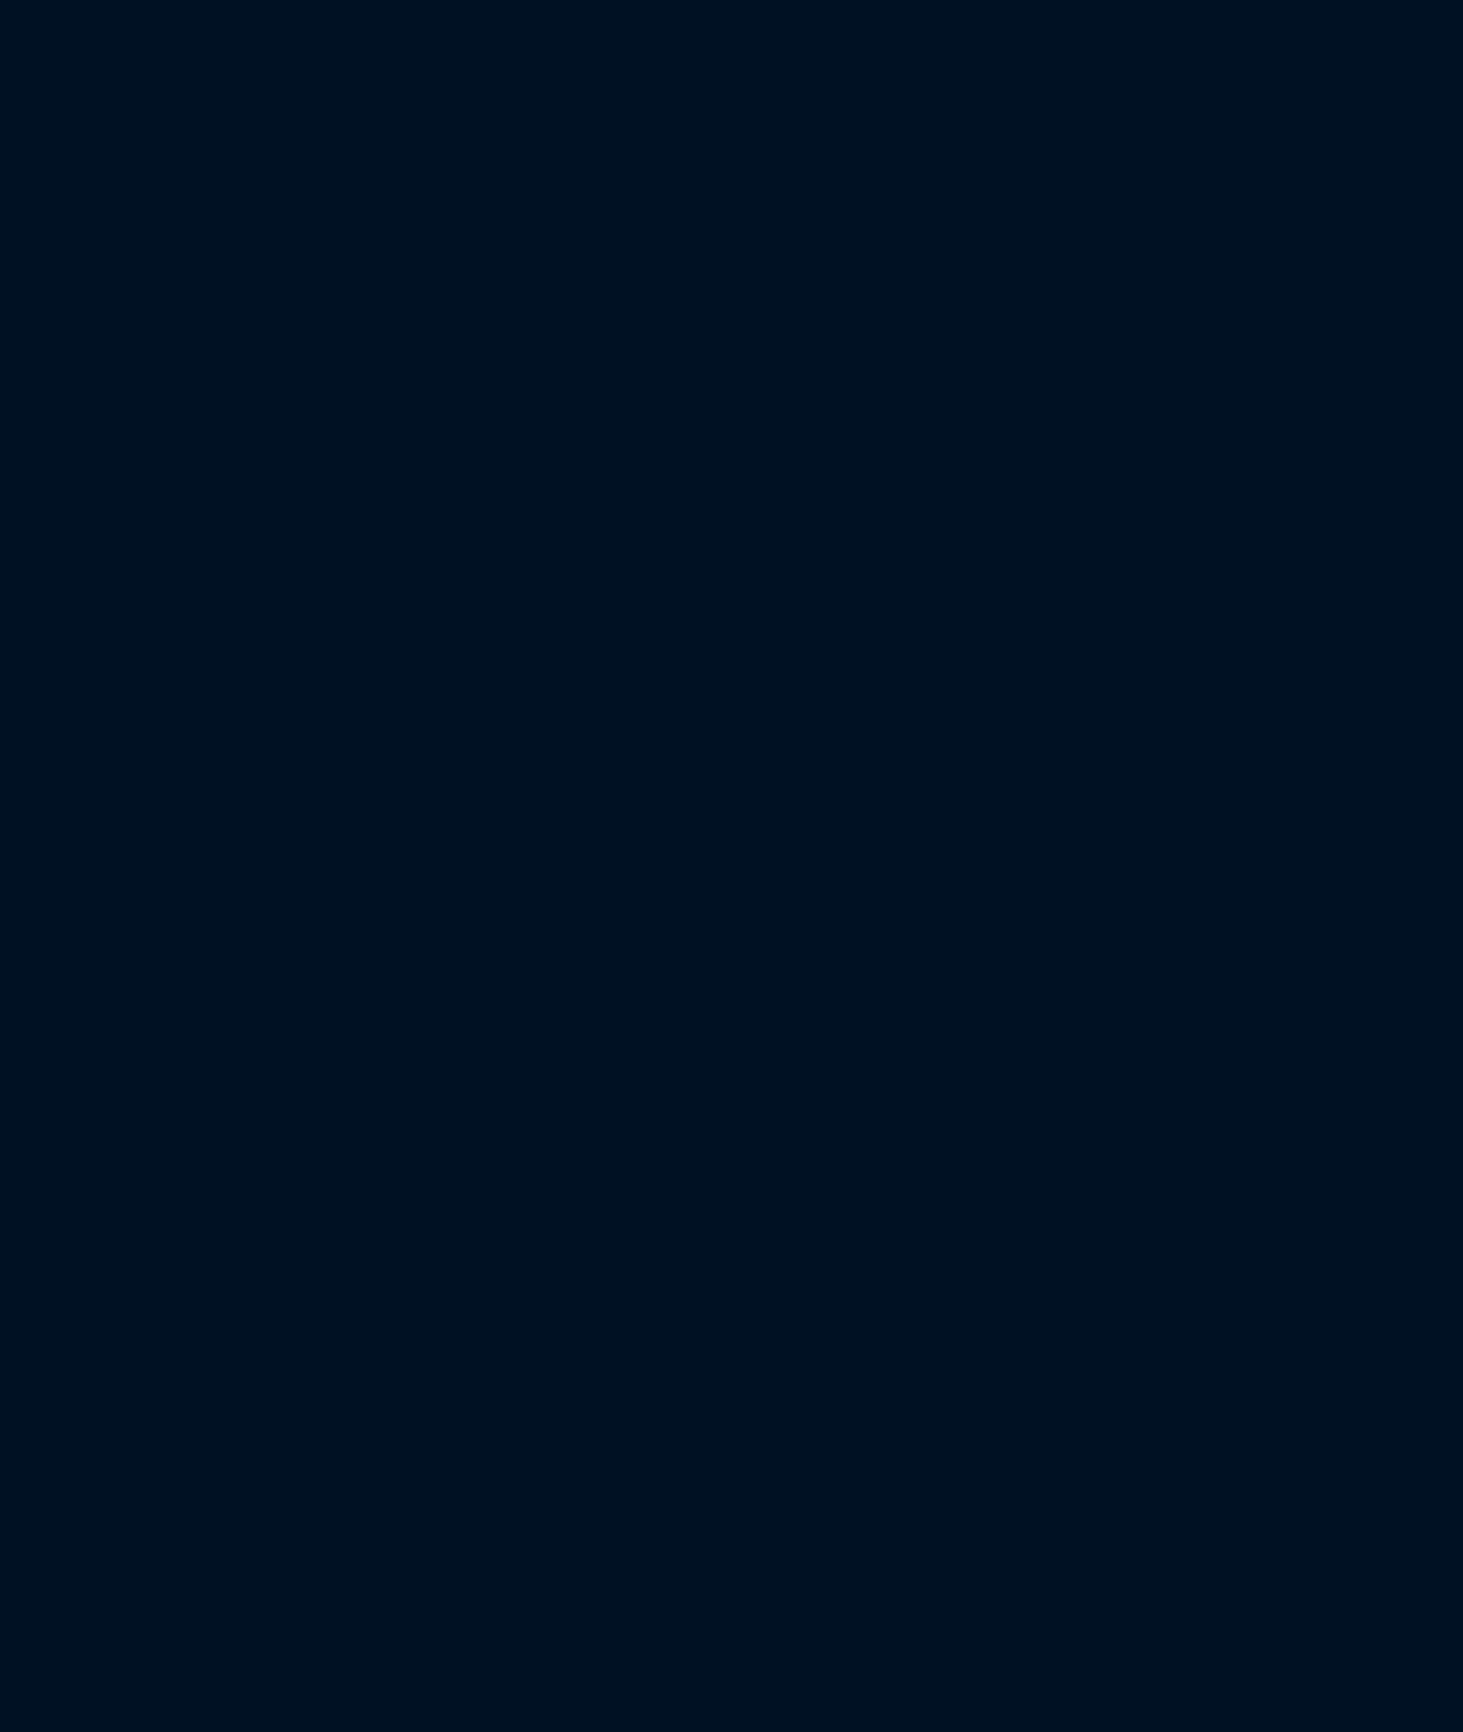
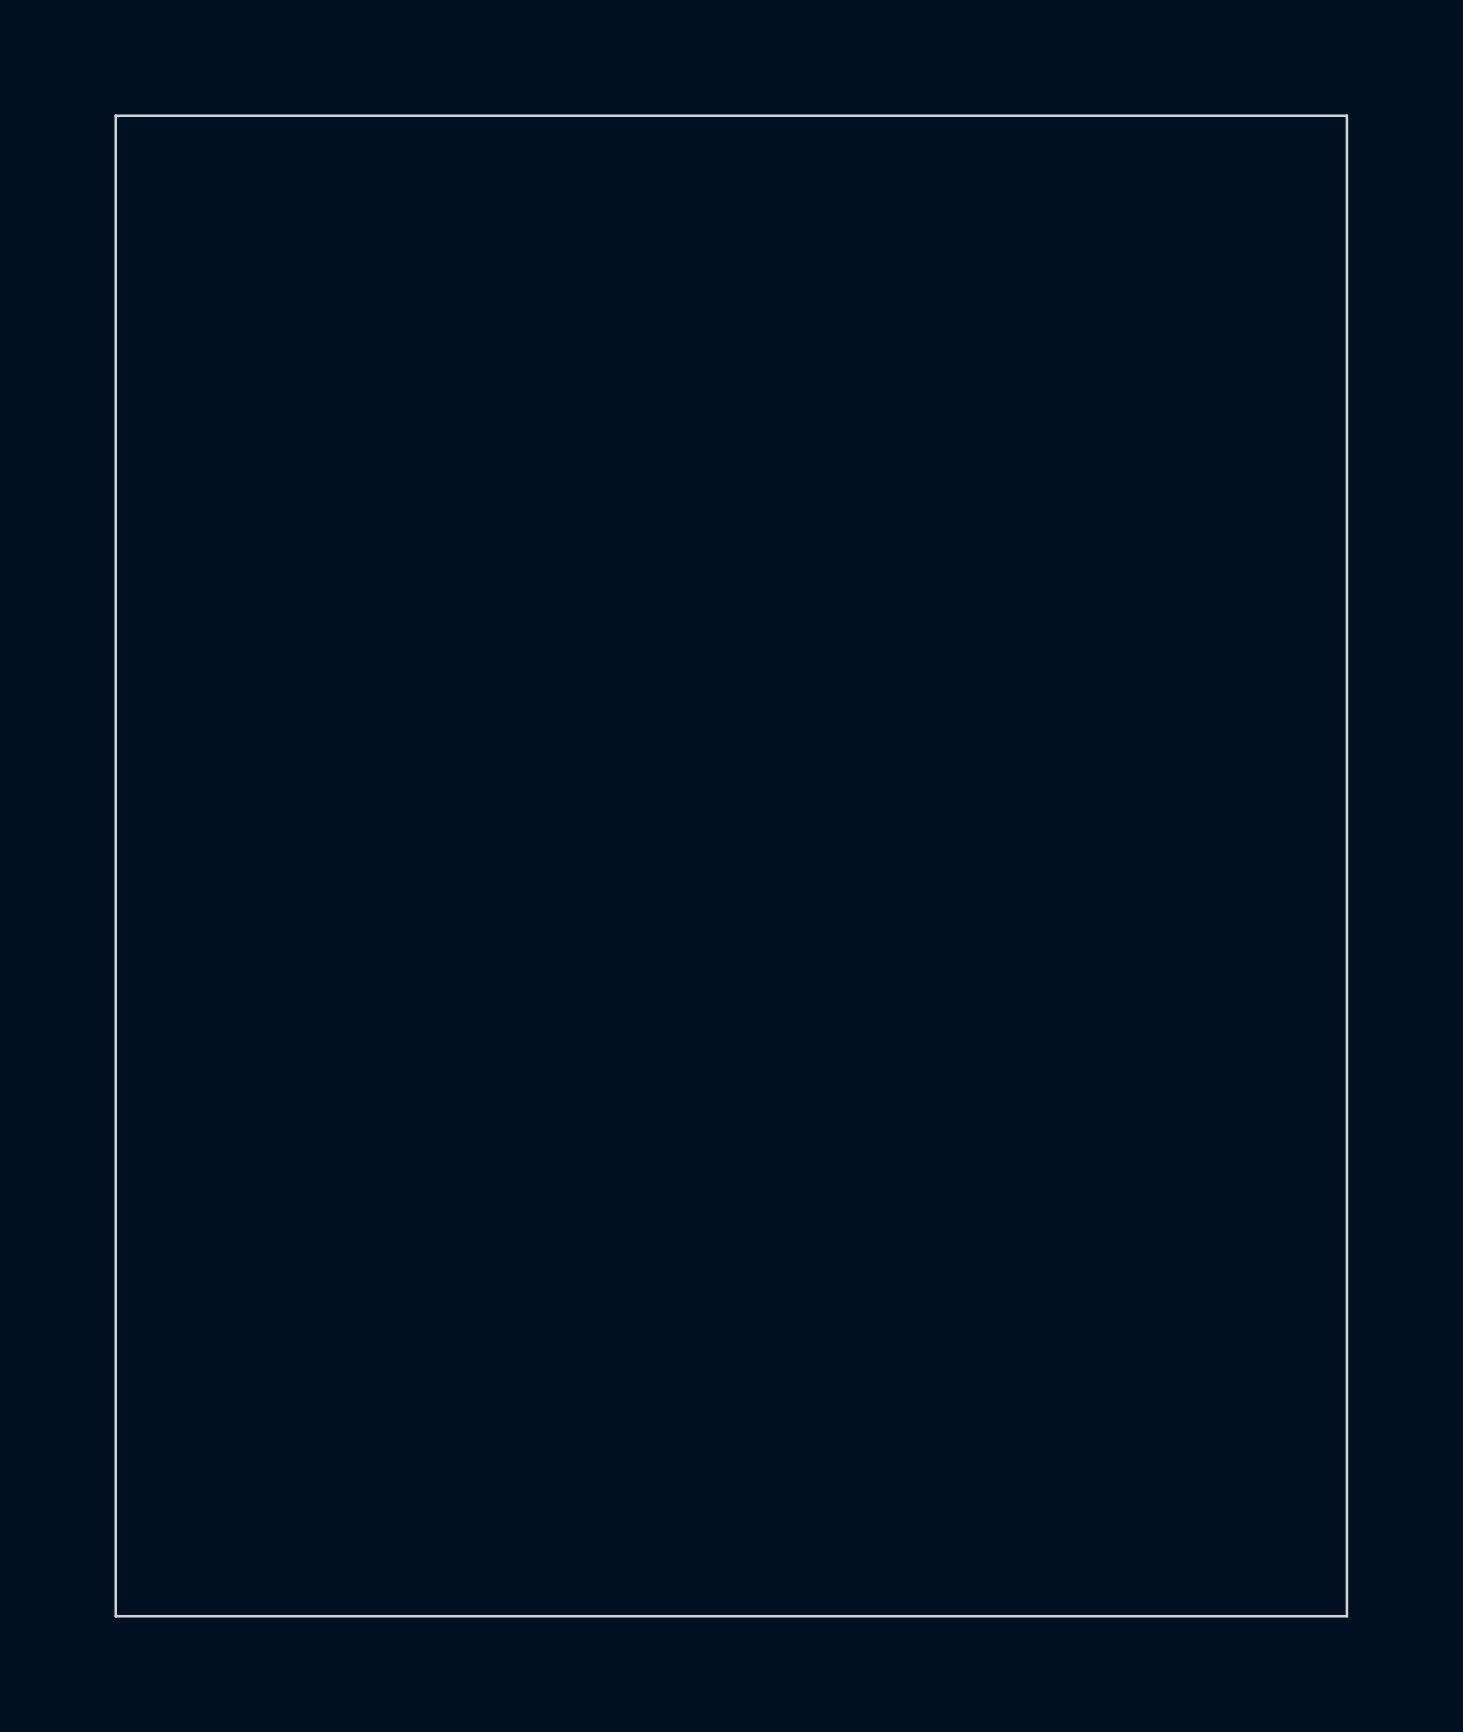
board edge: none -> (1346, 115) (115, 115) (115, 1616) (1346, 1616) (1346, 115)

